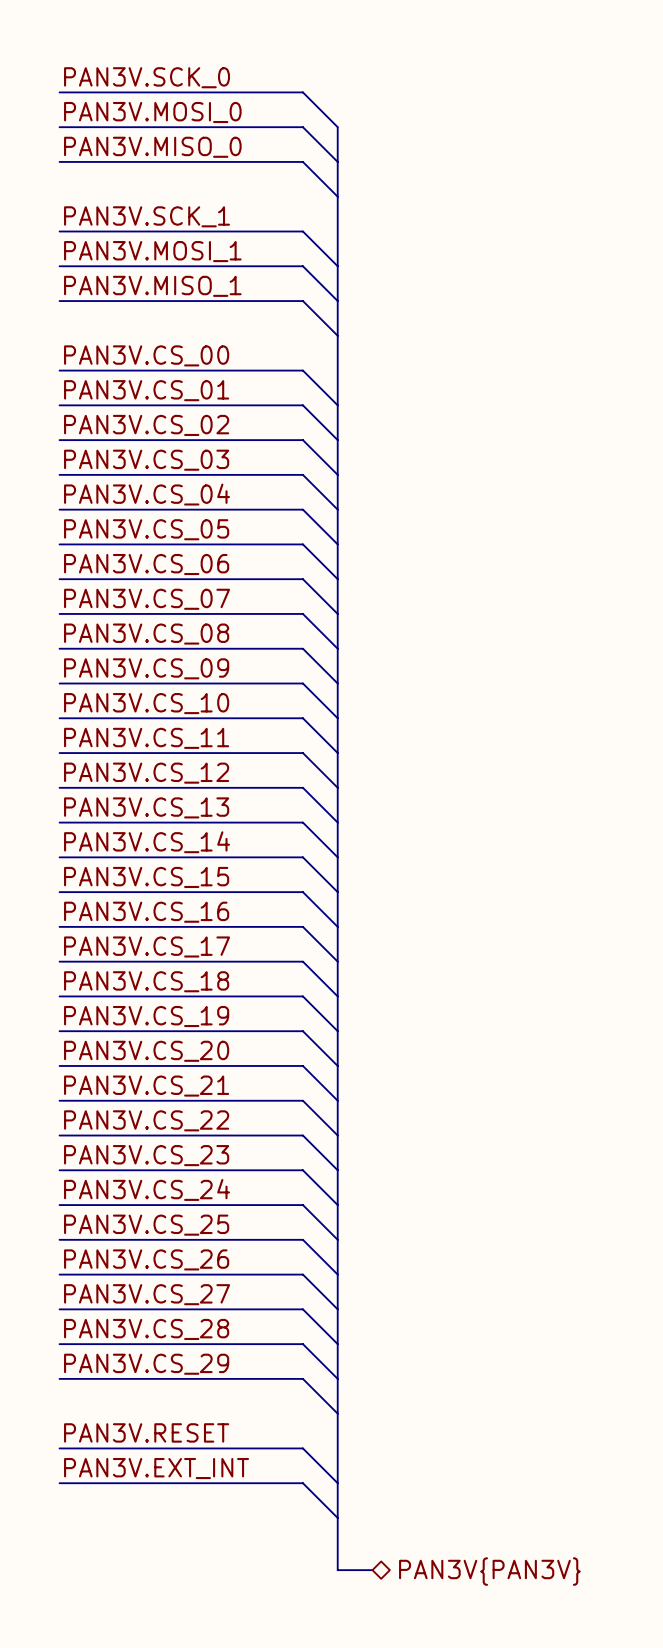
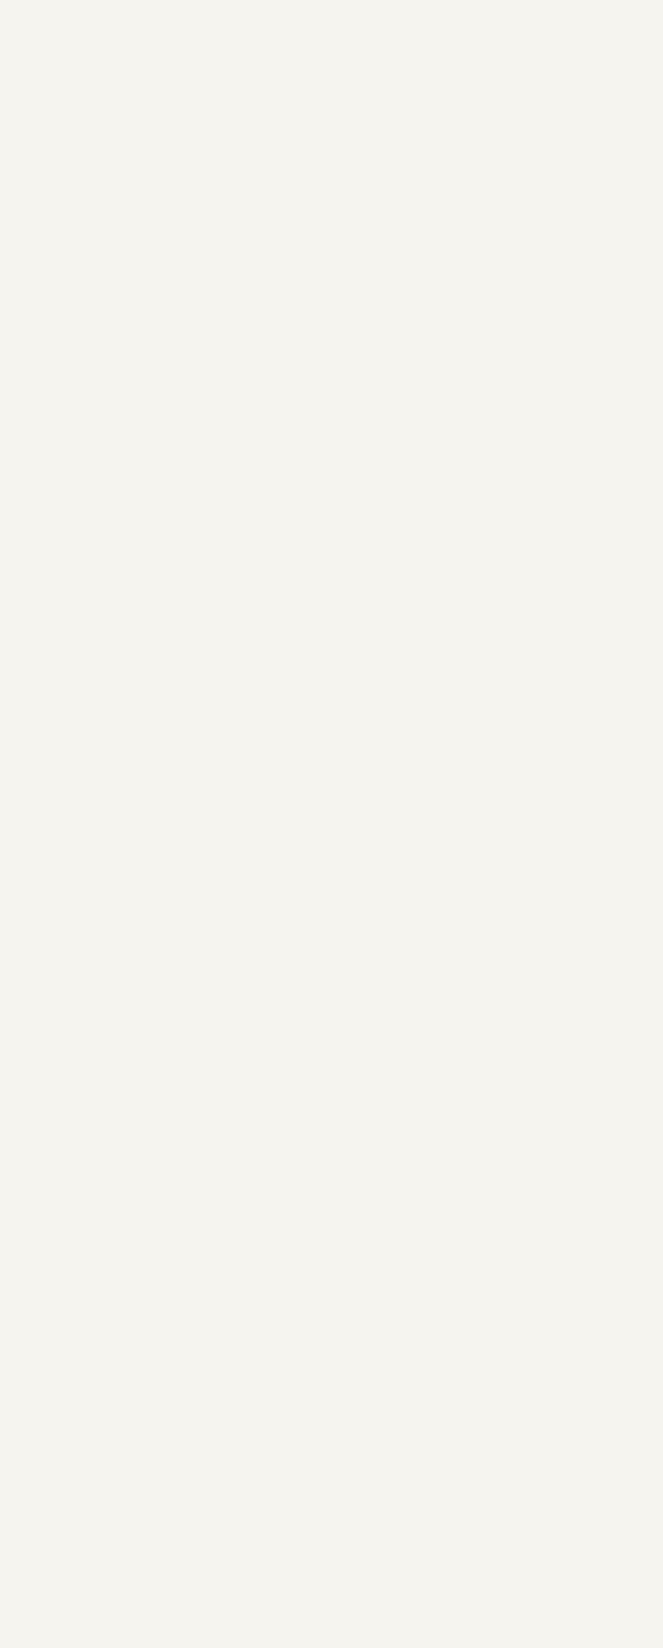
label: PAN3V.SCK_0 (147, 77) -> none
wire: (59, 92) (302, 92) (337, 127) -> none
label: PAN3V.MOSI_0 (152, 112) -> none
wire: (59, 127) (302, 127) (337, 161) -> none
bus: (337, 127) (337, 1570) (372, 1570) -> none
label: PAN3V.MISO_0 (152, 147) -> none
wire: (59, 161) (302, 161) (337, 196) -> none
label: PAN3V.SCK_1 (147, 216) -> none
wire: (59, 231) (302, 231) (337, 266) -> none
label: PAN3V.MOSI_1 (152, 251) -> none
wire: (59, 266) (302, 266) (337, 301) -> none
label: PAN3V.MISO_1 (152, 286) -> none
wire: (59, 301) (302, 301) (337, 335) -> none
label: PAN3V.CS_00 (146, 355) -> none
wire: (59, 370) (302, 370) (337, 405) -> none
label: PAN3V.CS_01 (146, 390) -> none
wire: (59, 405) (302, 405) (337, 440) -> none
label: PAN3V.CS_02 (146, 425) -> none
wire: (59, 440) (302, 440) (337, 474) -> none
label: PAN3V.CS_03 (146, 460) -> none
wire: (59, 474) (302, 474) (337, 509) -> none
label: PAN3V.CS_04 (147, 494) -> none
wire: (59, 509) (302, 509) (337, 544) -> none
label: PAN3V.CS_05 (146, 529) -> none
wire: (59, 544) (302, 544) (337, 579) -> none
label: PAN3V.CS_06 (146, 564) -> none
wire: (59, 579) (302, 579) (337, 613) -> none
label: PAN3V.CS_07 (147, 599) -> none
wire: (59, 613) (302, 613) (337, 648) -> none
label: PAN3V.CS_08 (146, 634) -> none
wire: (59, 648) (302, 648) (337, 683) -> none
label: PAN3V.CS_09 (146, 668) -> none
wire: (59, 683) (302, 683) (337, 718) -> none
label: PAN3V.CS_10 (146, 703) -> none
wire: (59, 718) (302, 718) (337, 753) -> none
label: PAN3V.CS_11 (146, 738) -> none
wire: (59, 753) (302, 753) (337, 787) -> none
label: PAN3V.CS_12 (146, 773) -> none
wire: (59, 787) (302, 787) (337, 822) -> none
label: PAN3V.CS_13 (146, 807) -> none
wire: (59, 822) (302, 822) (337, 857) -> none
label: PAN3V.CS_14 (147, 842) -> none
wire: (59, 857) (302, 857) (337, 892) -> none
label: PAN3V.CS_15 (146, 877) -> none
wire: (59, 892) (302, 892) (337, 926) -> none
label: PAN3V.CS_16 (146, 912) -> none
wire: (59, 926) (302, 926) (337, 961) -> none
label: PAN3V.CS_17 (147, 946) -> none
wire: (59, 961) (302, 961) (337, 996) -> none
label: PAN3V.CS_18 (146, 981) -> none
wire: (59, 996) (302, 996) (337, 1031) -> none
label: PAN3V.CS_19 (146, 1016) -> none
wire: (59, 1031) (302, 1031) (337, 1065) -> none
label: PAN3V.CS_20 (146, 1051) -> none
wire: (59, 1065) (302, 1065) (337, 1100) -> none
label: PAN3V.CS_21 (146, 1086) -> none
wire: (59, 1100) (302, 1100) (337, 1135) -> none
label: PAN3V.CS_22 (146, 1120) -> none
wire: (59, 1135) (302, 1135) (337, 1170) -> none
label: PAN3V.CS_23 (146, 1155) -> none
wire: (59, 1170) (302, 1170) (337, 1205) -> none
label: PAN3V.CS_24 (147, 1189) -> none
wire: (59, 1205) (302, 1205) (337, 1239) -> none
label: PAN3V.CS_25 (146, 1225) -> none
wire: (59, 1239) (302, 1239) (337, 1274) -> none
label: PAN3V.CS_26 (146, 1259) -> none
wire: (59, 1274) (302, 1274) (337, 1309) -> none
label: PAN3V.CS_27 (147, 1294) -> none
wire: (59, 1309) (302, 1309) (337, 1344) -> none
label: PAN3V.CS_28 (146, 1329) -> none
wire: (59, 1344) (302, 1344) (337, 1378) -> none
label: PAN3V.CS_29 (146, 1364) -> none
wire: (59, 1378) (302, 1378) (337, 1413) -> none
label: PAN3V.RESET (146, 1432) -> none
wire: (59, 1448) (302, 1448) (337, 1483) -> none
label: PAN3V.EXT_INT (156, 1468) -> none
wire: (59, 1483) (302, 1483) (337, 1517) -> none
hierarchical label: PAN3V{PAN3V} (489, 1571) -> none

